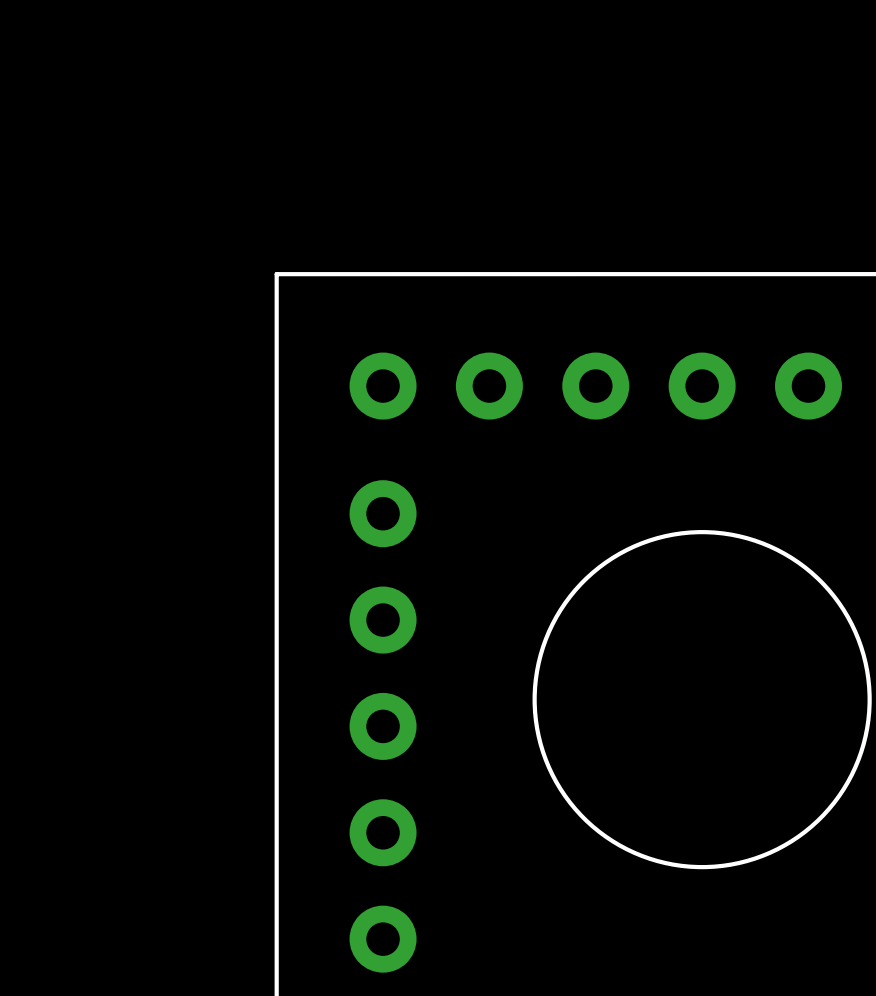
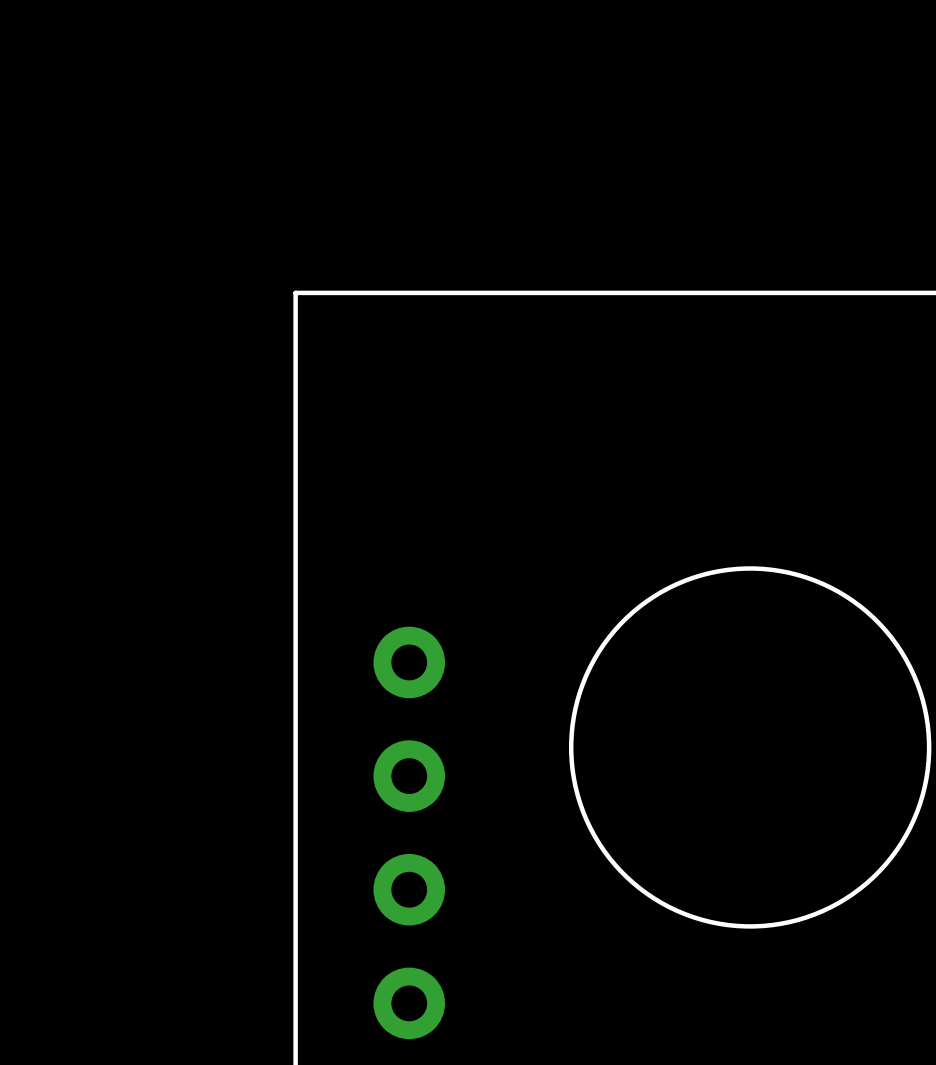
via: (383, 386) -> none
via: (489, 386) -> none
via: (595, 386) -> none
via: (702, 386) -> none
via: (808, 386) -> none
via: (383, 513) -> none

